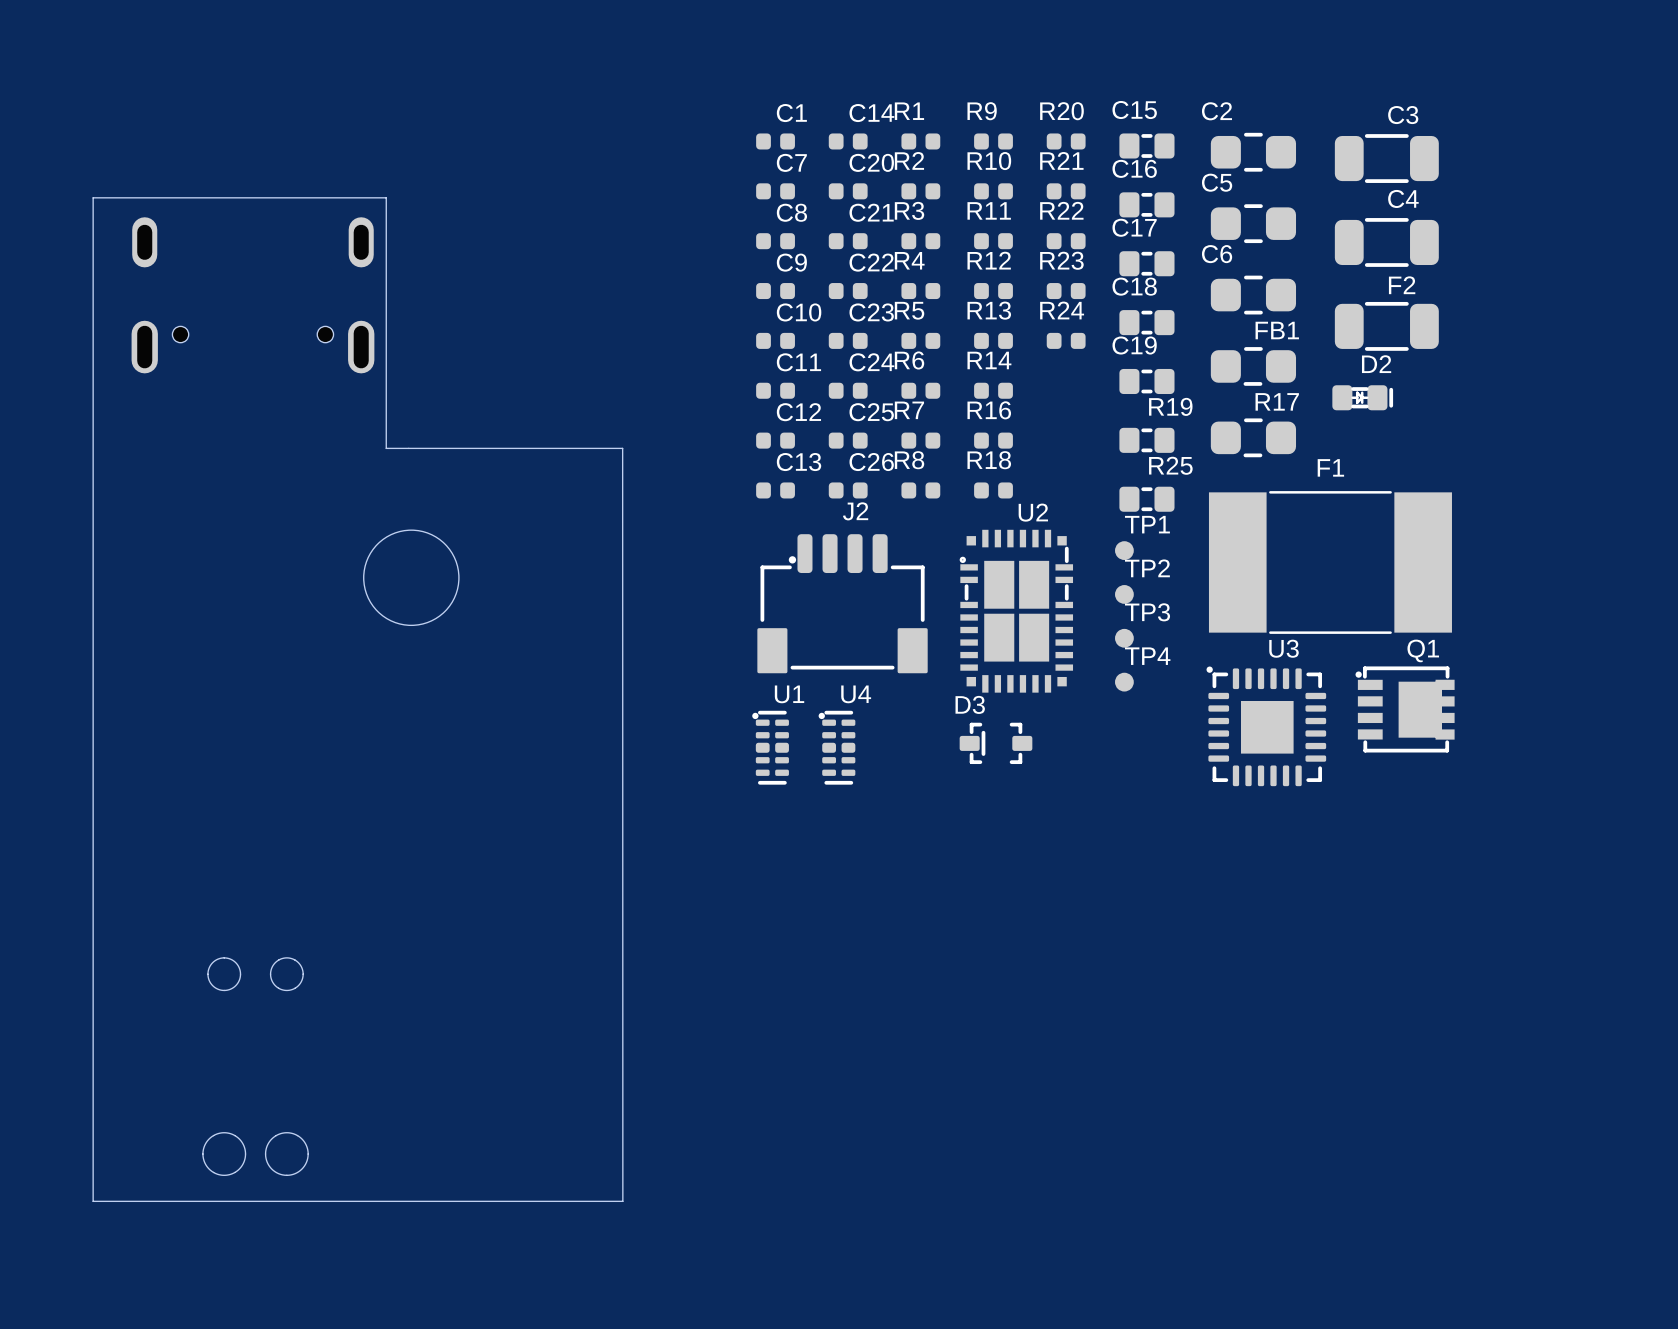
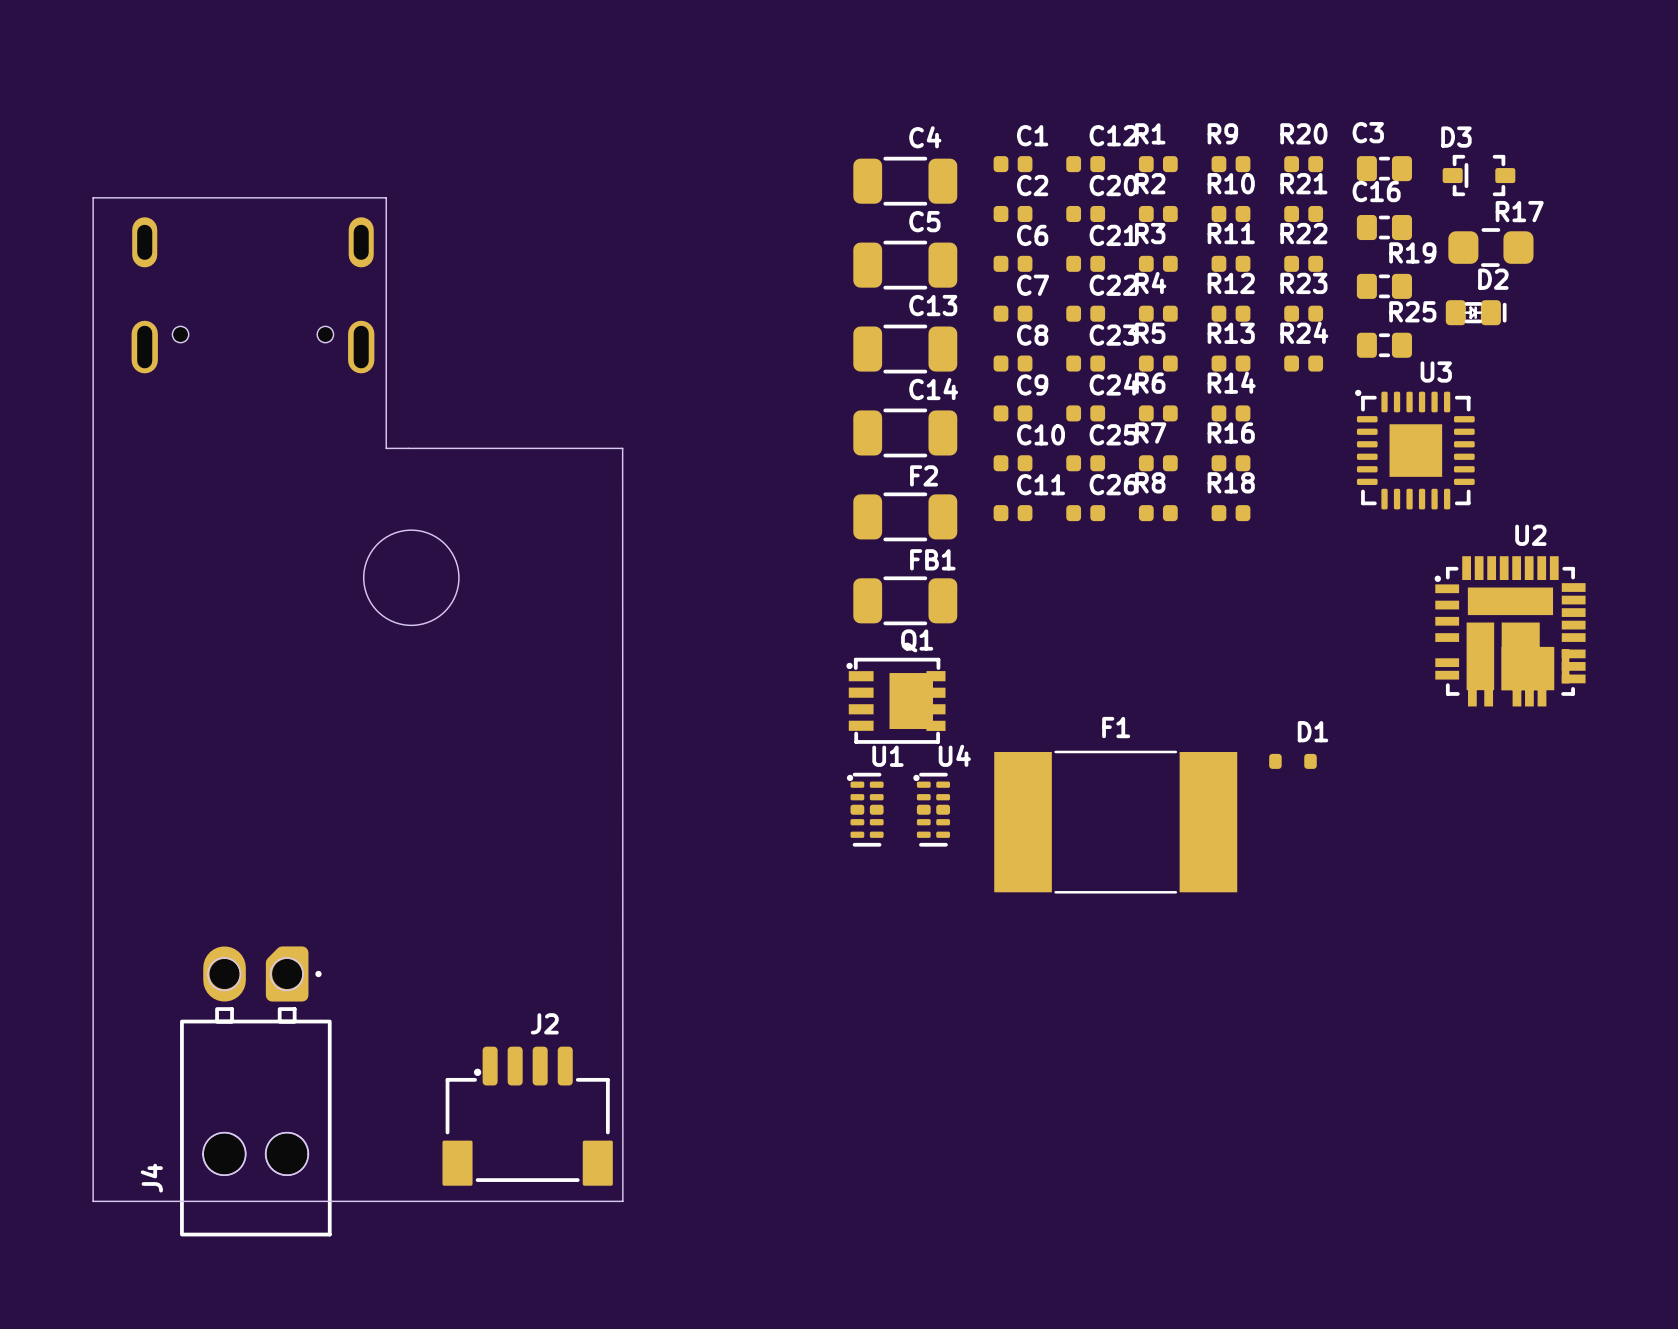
C2 name position: C2 (1216, 111) -> C2 (1032, 185)
C2 footprint: [1210, 132, 1297, 172] -> [993, 205, 1033, 222]
C14 footprint: [828, 133, 868, 150] -> [853, 408, 958, 458]
C3 footprint: [1334, 134, 1439, 183] -> [1356, 156, 1412, 182]
C1 position: (775, 141) -> (1013, 164)
R1 position: (920, 141) -> (1158, 164)
R9 position: (993, 141) -> (1230, 164)
R20 position: (1066, 141) -> (1303, 164)
C15: (1146, 145) -> none
C5 name position: C5 (1217, 182) -> C5 (924, 221)
C7 position: (775, 191) -> (1013, 313)
C20 position: (848, 191) -> (1085, 213)
R2 position: (920, 191) -> (1158, 213)
R10 position: (993, 191) -> (1230, 213)
R21 position: (1066, 191) -> (1303, 213)
C16 position: (1146, 204) -> (1384, 227)
C5 footprint: [1210, 204, 1297, 244] -> [853, 240, 958, 290]
C8 position: (775, 241) -> (1013, 363)
C21 position: (848, 241) -> (1085, 263)
R3 position: (920, 241) -> (1158, 263)
R11 position: (993, 241) -> (1230, 263)
R22 position: (1066, 241) -> (1303, 263)
C4 position: (1386, 242) -> (905, 181)
C6 name position: C6 (1217, 254) -> C6 (1032, 235)
C17: (1146, 263) -> none
C6 footprint: [1210, 275, 1297, 315] -> [993, 255, 1033, 272]
C9 position: (775, 291) -> (1013, 413)
C22 position: (848, 291) -> (1085, 313)
R4 position: (920, 291) -> (1158, 313)
R12 position: (993, 291) -> (1230, 313)
R23 position: (1066, 291) -> (1303, 313)
C18: (1146, 322) -> none
F2 position: (1386, 326) -> (905, 516)
C10 position: (775, 340) -> (1013, 463)
C23 position: (848, 340) -> (1085, 363)
R5 position: (920, 340) -> (1158, 363)
R13 position: (993, 340) -> (1230, 363)
R24 position: (1066, 340) -> (1303, 363)
FB1 footprint: [1210, 347, 1297, 386] -> [853, 576, 958, 626]
C19: (1146, 381) -> none
C11 position: (775, 390) -> (1013, 513)
C24 position: (848, 390) -> (1085, 413)
R6 position: (920, 390) -> (1158, 413)
R14 position: (993, 390) -> (1230, 413)
D2 position: (1362, 397) -> (1476, 312)
R17 position: (1253, 437) -> (1490, 247)
C12 position: (775, 440) -> (1085, 164)
C25 position: (848, 440) -> (1085, 463)
R7 position: (920, 440) -> (1158, 463)
R16 position: (993, 440) -> (1230, 463)
R19 position: (1146, 440) -> (1384, 286)
C13 footprint: [756, 482, 795, 499] -> [853, 324, 958, 374]
C26 position: (848, 490) -> (1085, 513)
R8 position: (920, 490) -> (1158, 513)
R18 position: (993, 490) -> (1230, 513)
R25 position: (1146, 499) -> (1384, 345)
U2 footprint: [959, 529, 1074, 693] -> [1434, 556, 1586, 707]
TP1: (1124, 550) -> none
F1 position: (1330, 562) -> (1115, 822)
TP2: (1124, 594) -> none
J2 position: (842, 603) -> (527, 1116)
TP3: (1124, 638) -> none
TP4: (1124, 682) -> none
Q1 position: (1405, 709) -> (895, 700)
U3 position: (1266, 726) -> (1414, 449)
D3 position: (996, 743) -> (1479, 175)
U1 position: (770, 747) -> (865, 809)
U4 position: (836, 747) -> (931, 809)
D1: none -> (1292, 761)
J4: none -> (255, 1091)

